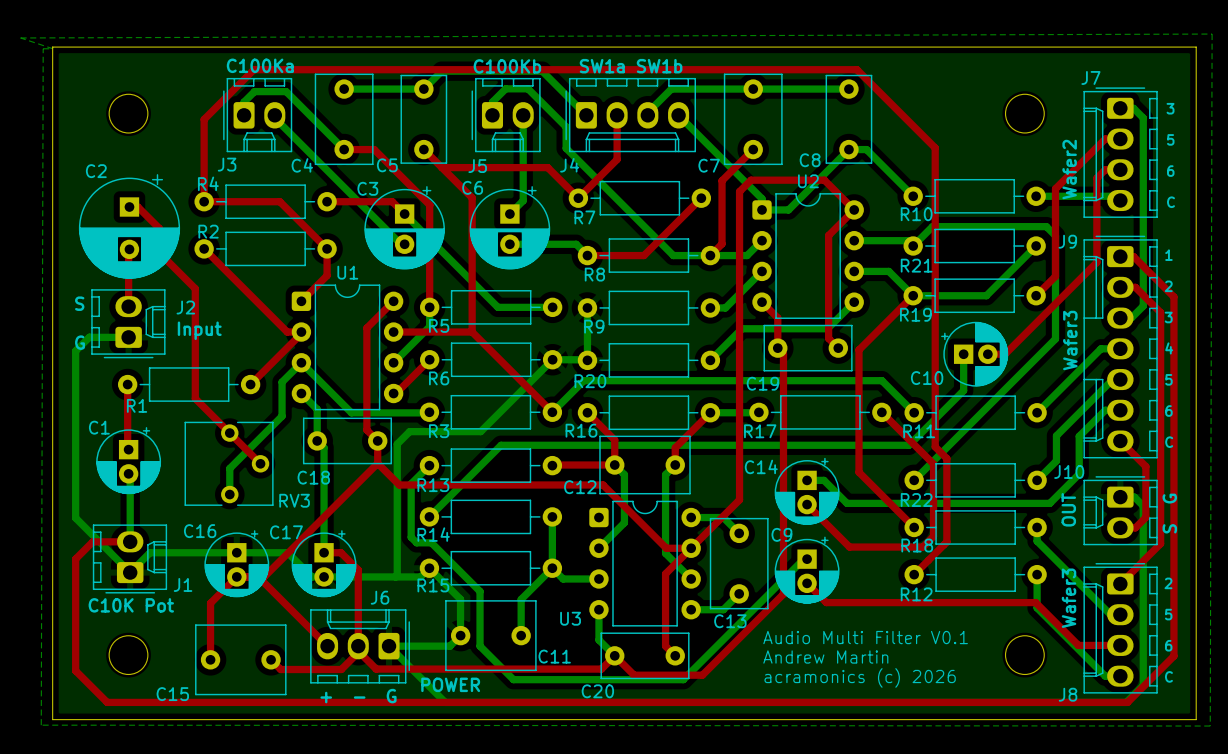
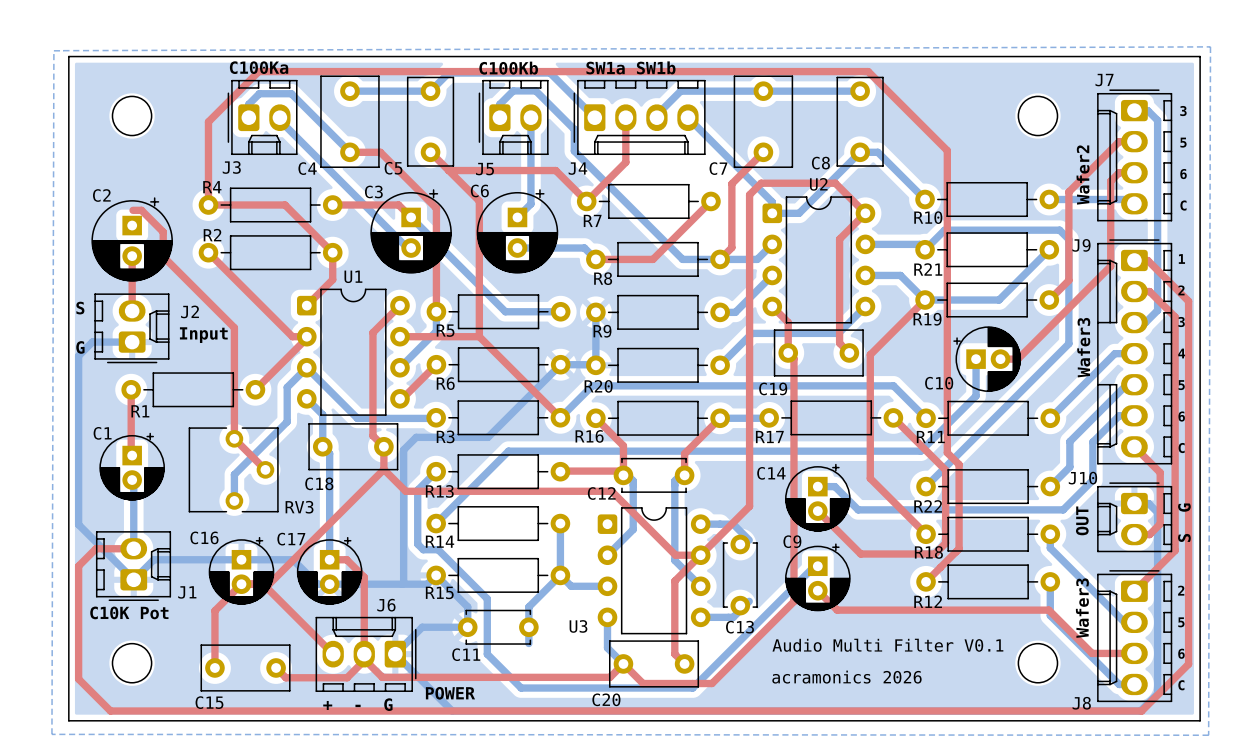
bottom zone outline: (1212, 34) (20, 37) (52, 48) (43, 48) (41, 725) (1210, 726) (1212, 34) -> (1210, 46) (53, 50) (51, 734) (1208, 735) (1210, 46)
board edge: (52, 47) (1196, 47) (1196, 719) (52, 719) (52, 47) -> (68, 56) (68, 720) (1200, 720) (1200, 56) (68, 56)
C2 footprint: [78, 174, 181, 279] -> [91, 197, 173, 282]
top track: (195, 288) (195, 398) (229, 433) -> (199, 292) (234, 327) (234, 438)
C12 footprint: [599, 435, 691, 495] -> [613, 457, 695, 493]
C13 footprint: [709, 517, 769, 610] -> [722, 534, 758, 616]
bottom track: (460, 599) (460, 635) (450, 646) (389, 646) -> (467, 606) (467, 627) (422, 627) (395, 654)
C11 footprint: [445, 600, 537, 672] -> [457, 609, 539, 645]
C15 footprint: [195, 624, 287, 696] -> [200, 644, 291, 692]
C11 name position: C11 (554, 656) -> C11 (466, 654)
text: Andrew Martin (825, 657) -> none
text: acramonics (c) 2026 (860, 677) -> acramonics 2026 (846, 677)
C15 name position: C15 (172, 694) -> C15 (209, 702)

